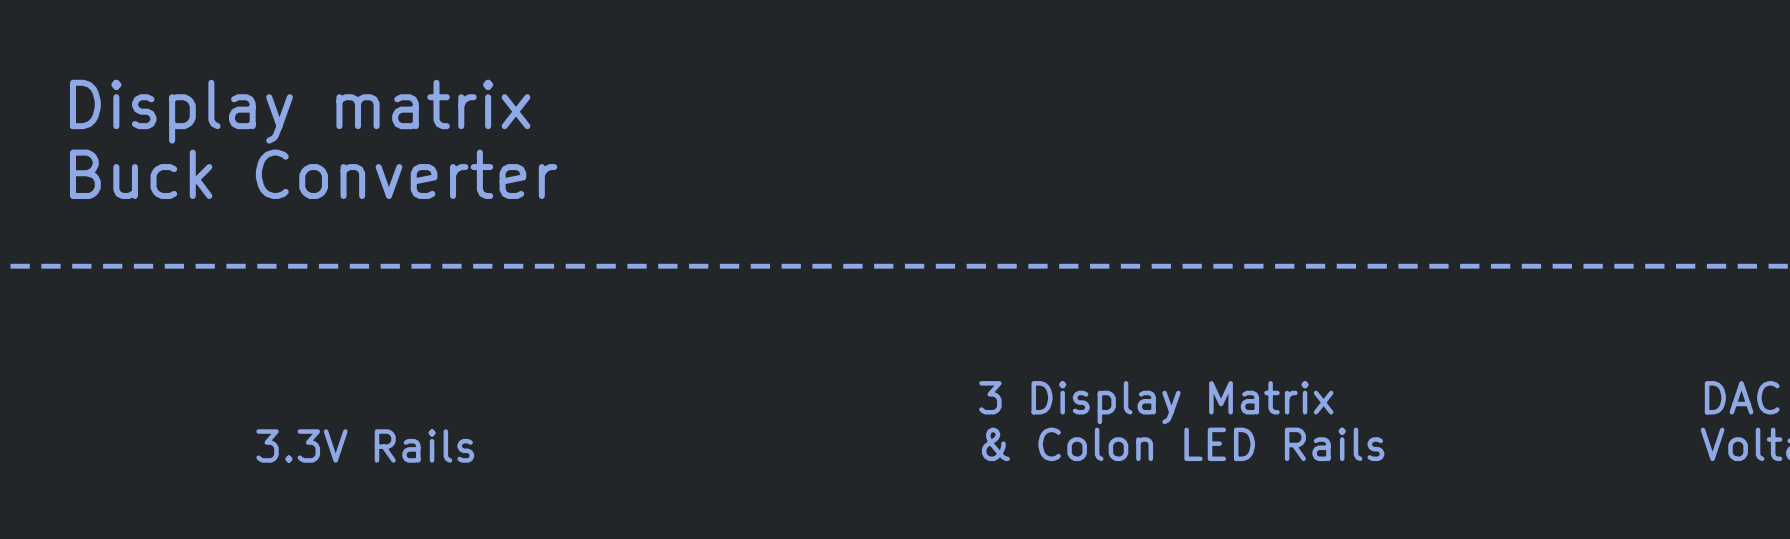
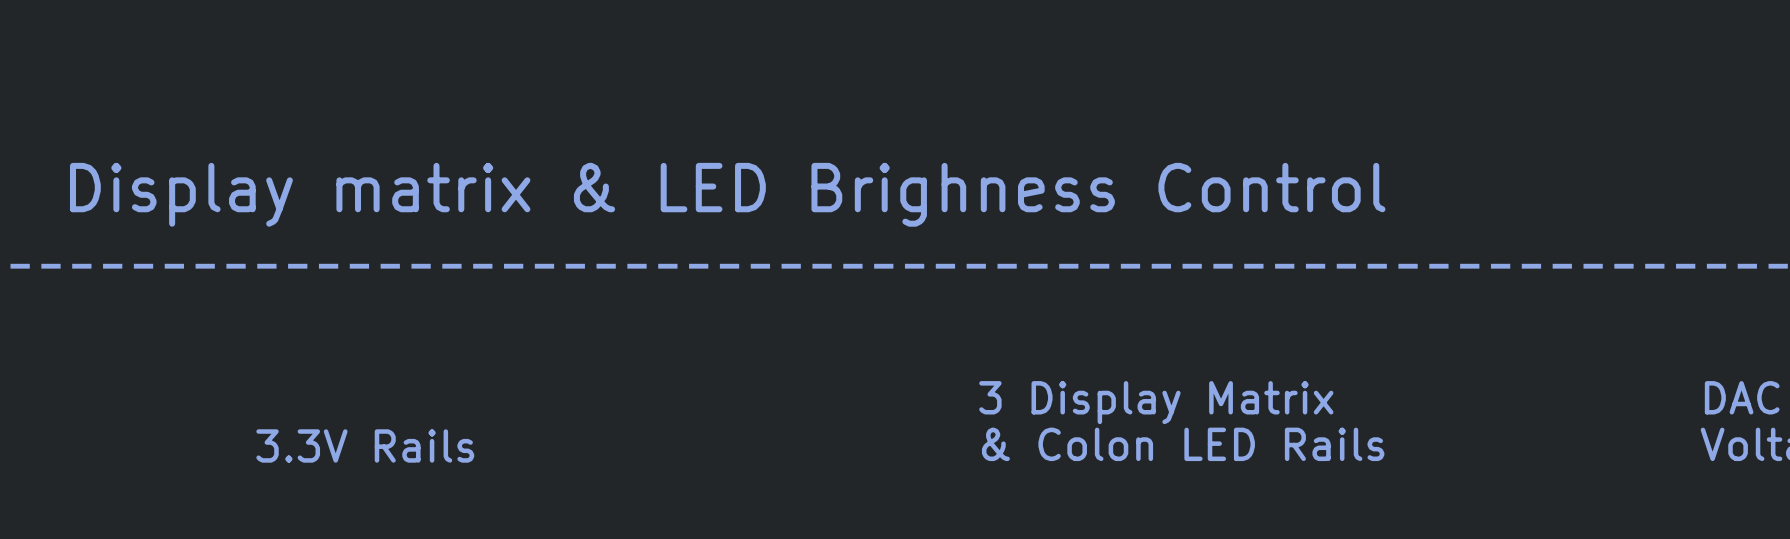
text: Display matrix (300, 111) -> none
text: Buck Converter (313, 174) -> Display matrix & LED Brighness Control (727, 194)

